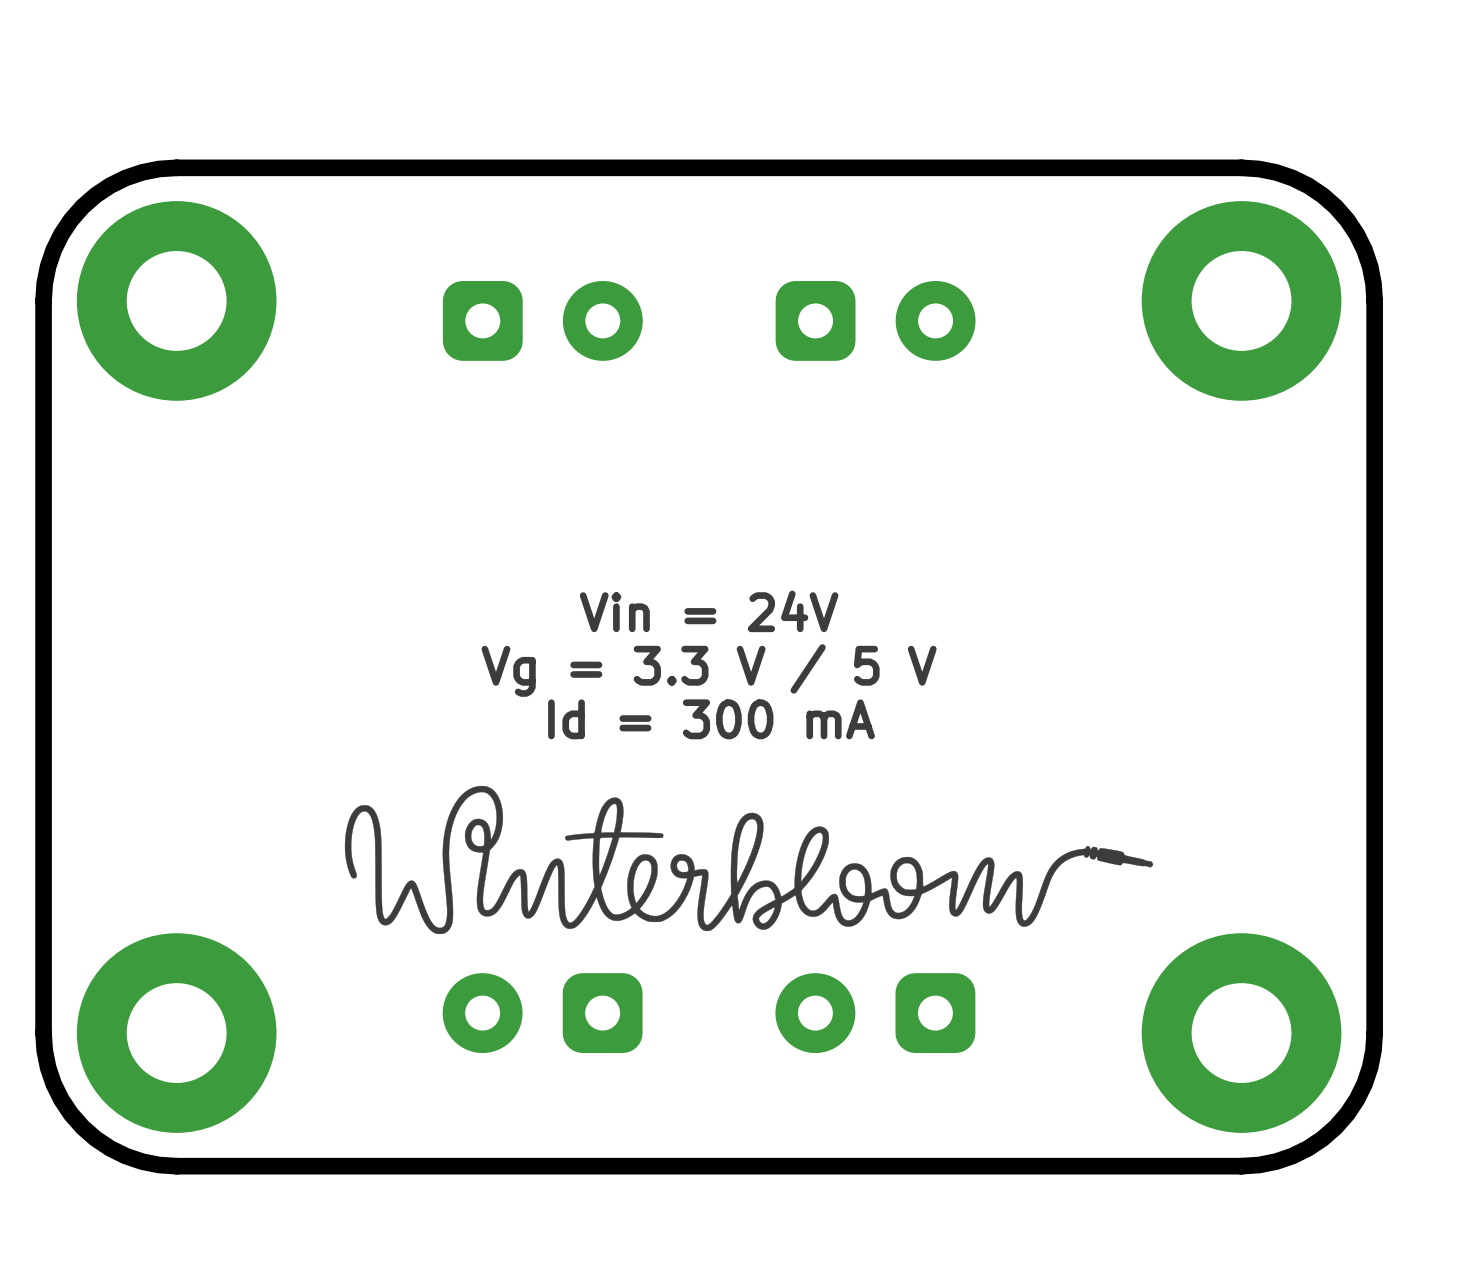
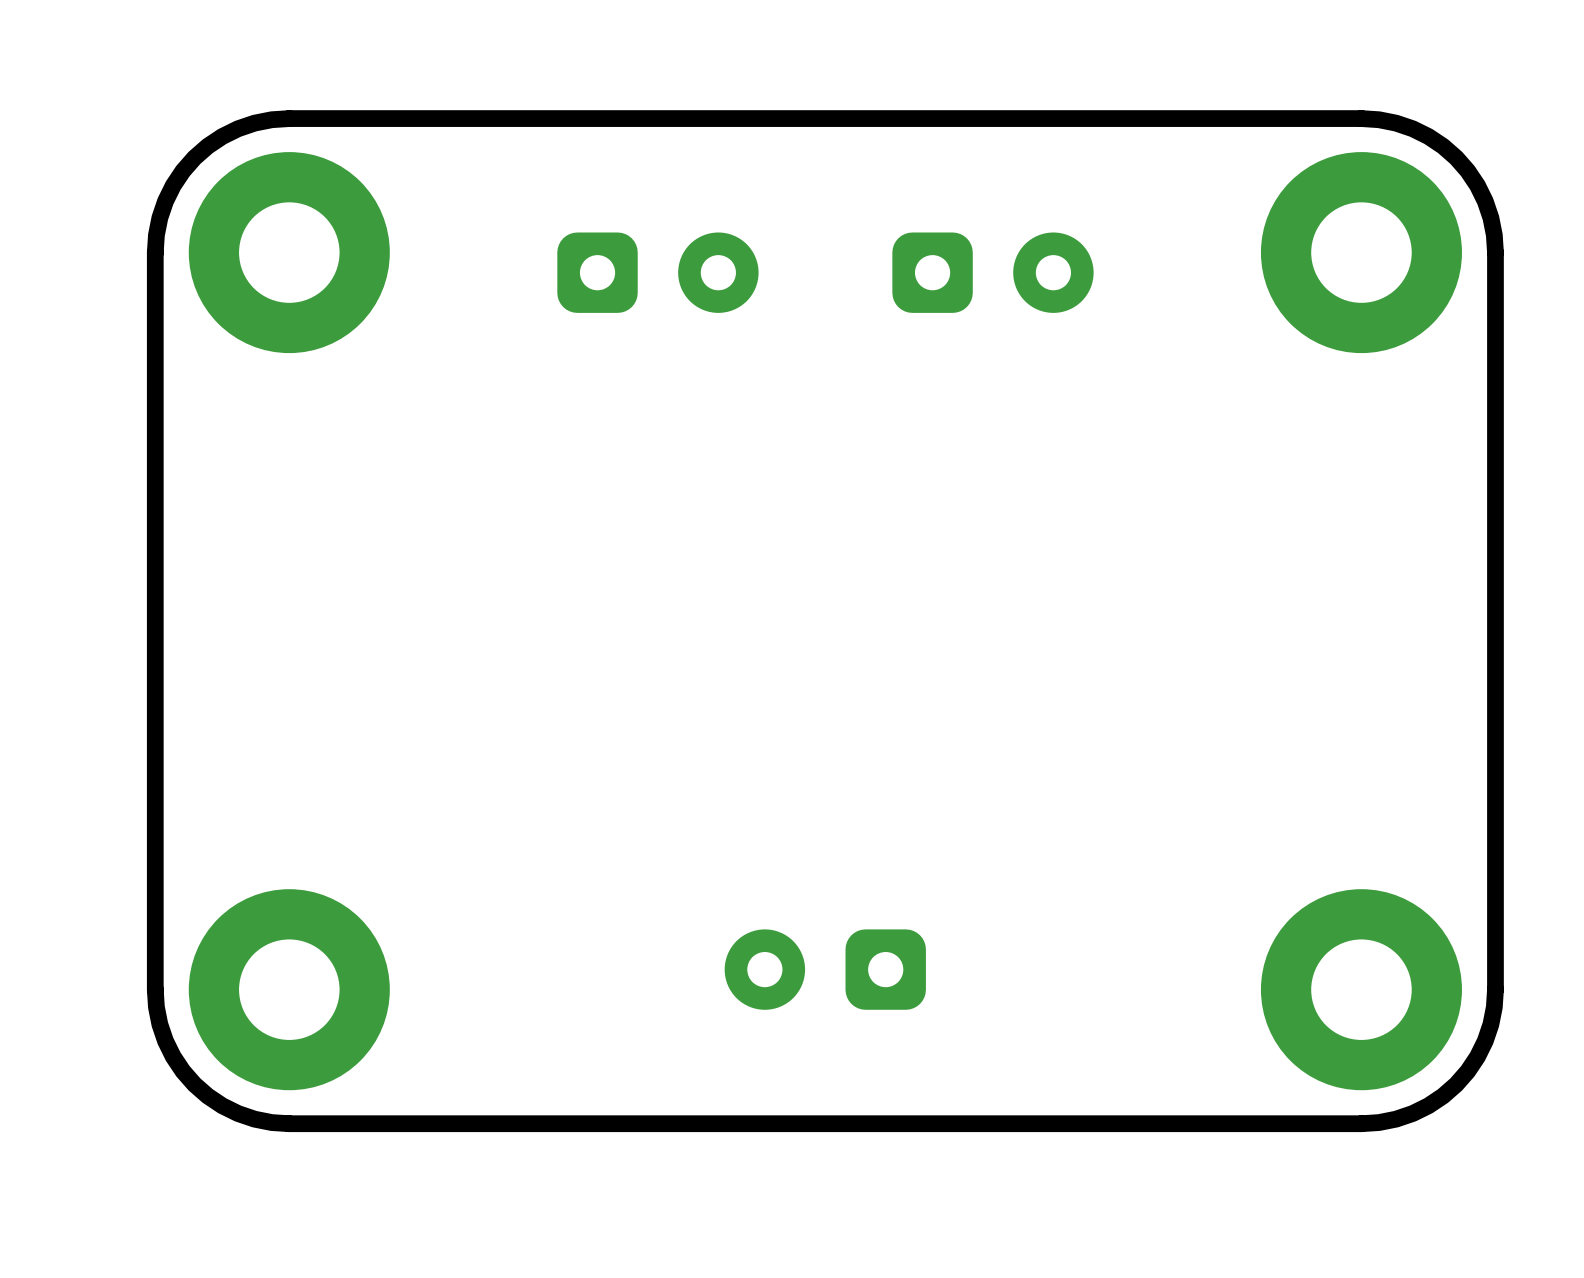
text: Vin = 24V (709, 611) -> none
text: Vg = 3.3 V / 5 V (709, 670) -> none
text: Id = 300 mA (711, 719) -> none
drawing: [344, 785, 1154, 935] -> none
part: (542, 1013) -> none
part: none -> (825, 969)
part: (875, 1013) -> none

